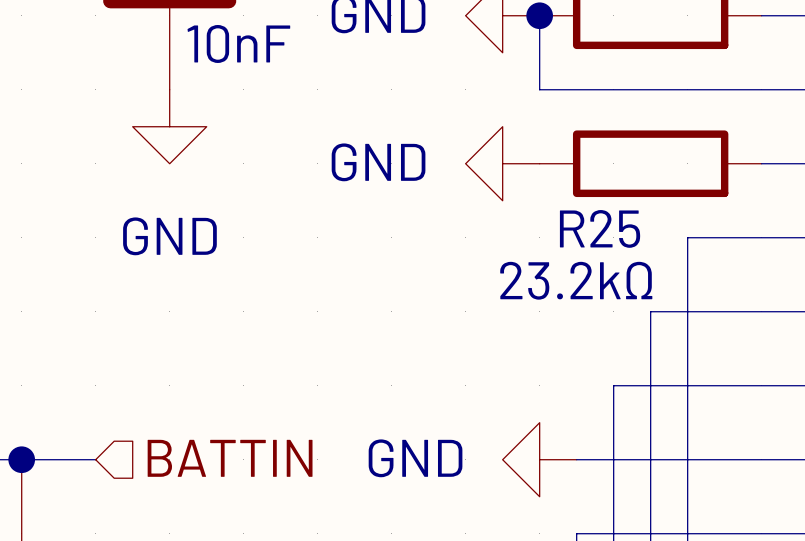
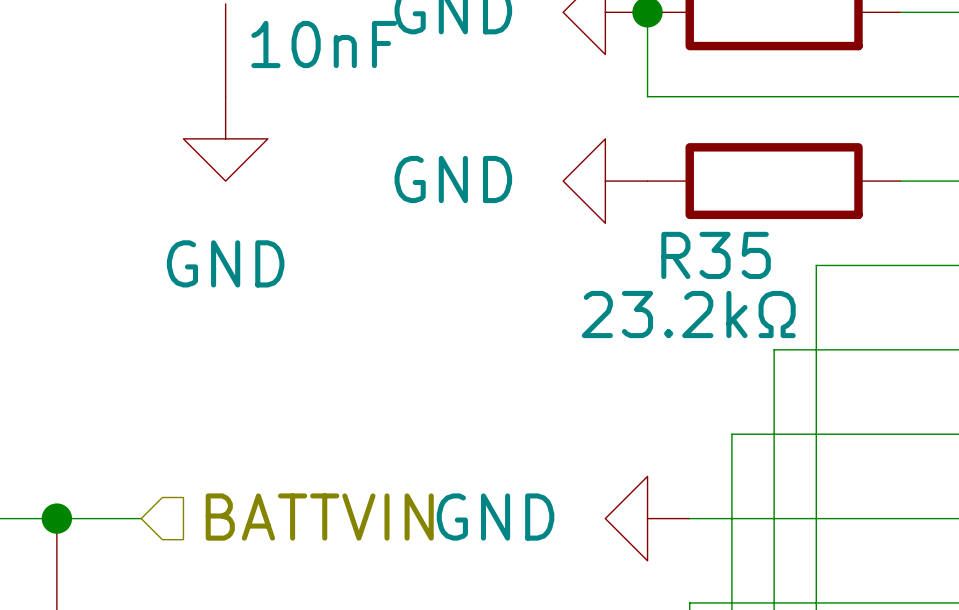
R25 name: R25 (600, 228) -> R35 (716, 255)
hierarchical label: BATTIN (230, 458) -> BATTVIN (319, 517)

